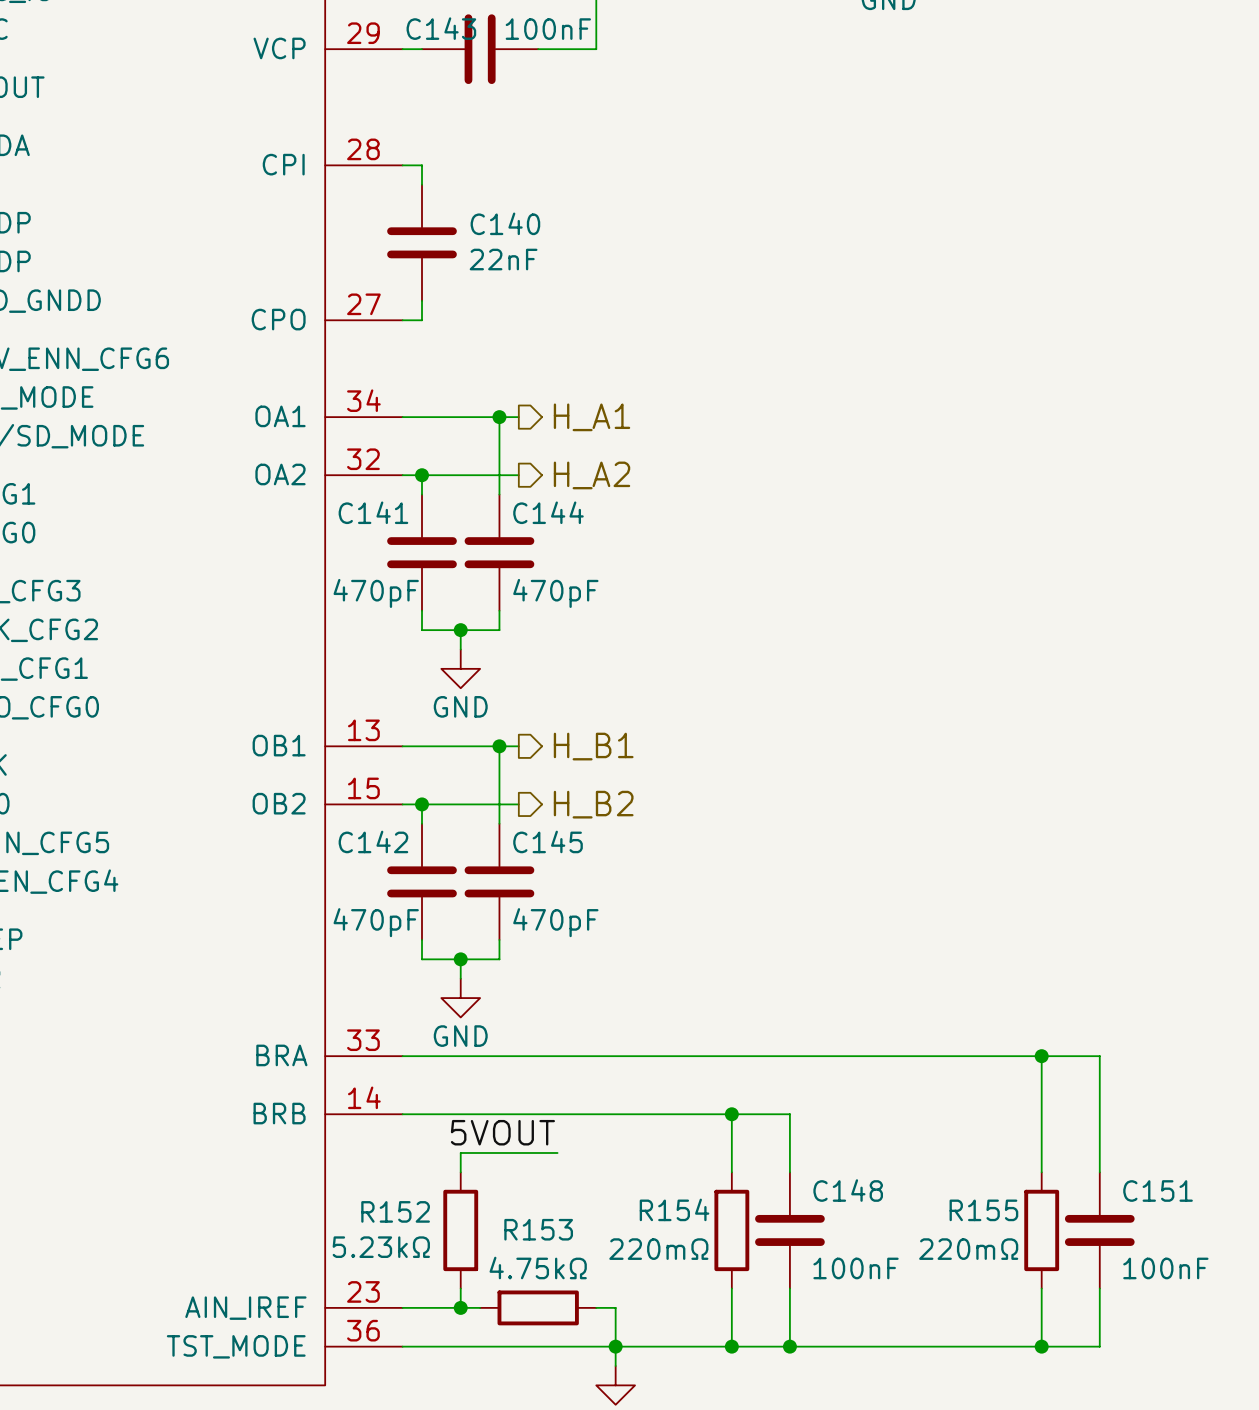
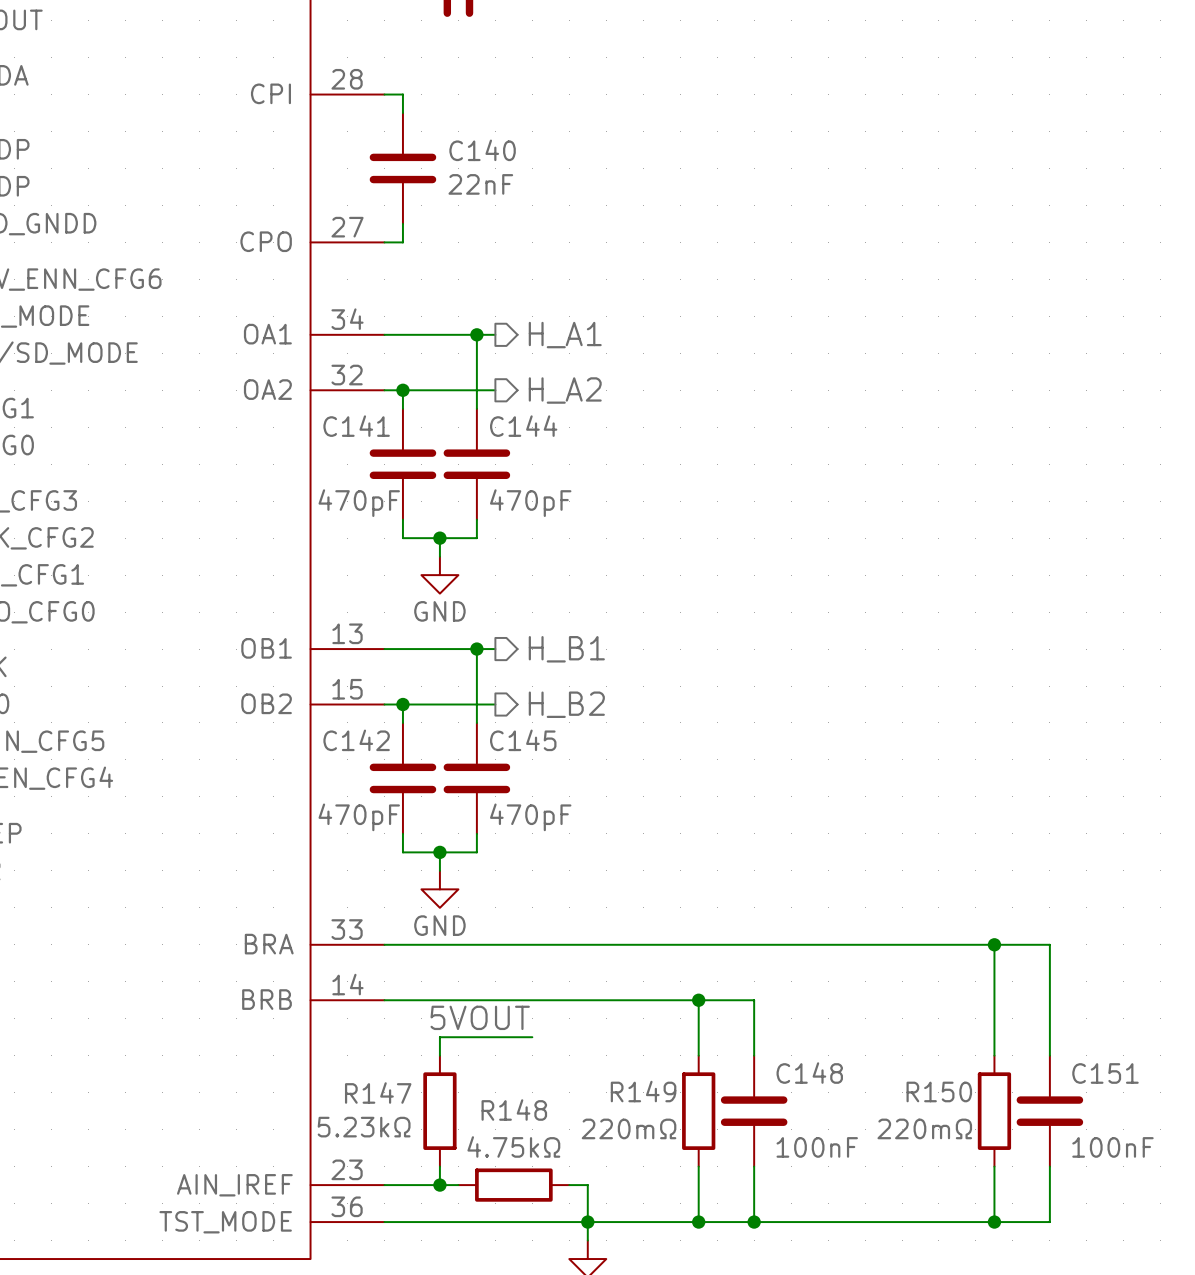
R154 name: R154 (674, 1209) -> R149 (643, 1091)
R155 name: R155 (983, 1210) -> R150 (939, 1091)
R152 name: R152 (395, 1211) -> R147 (378, 1093)
R153 name: R153 (538, 1229) -> R148 (514, 1110)

